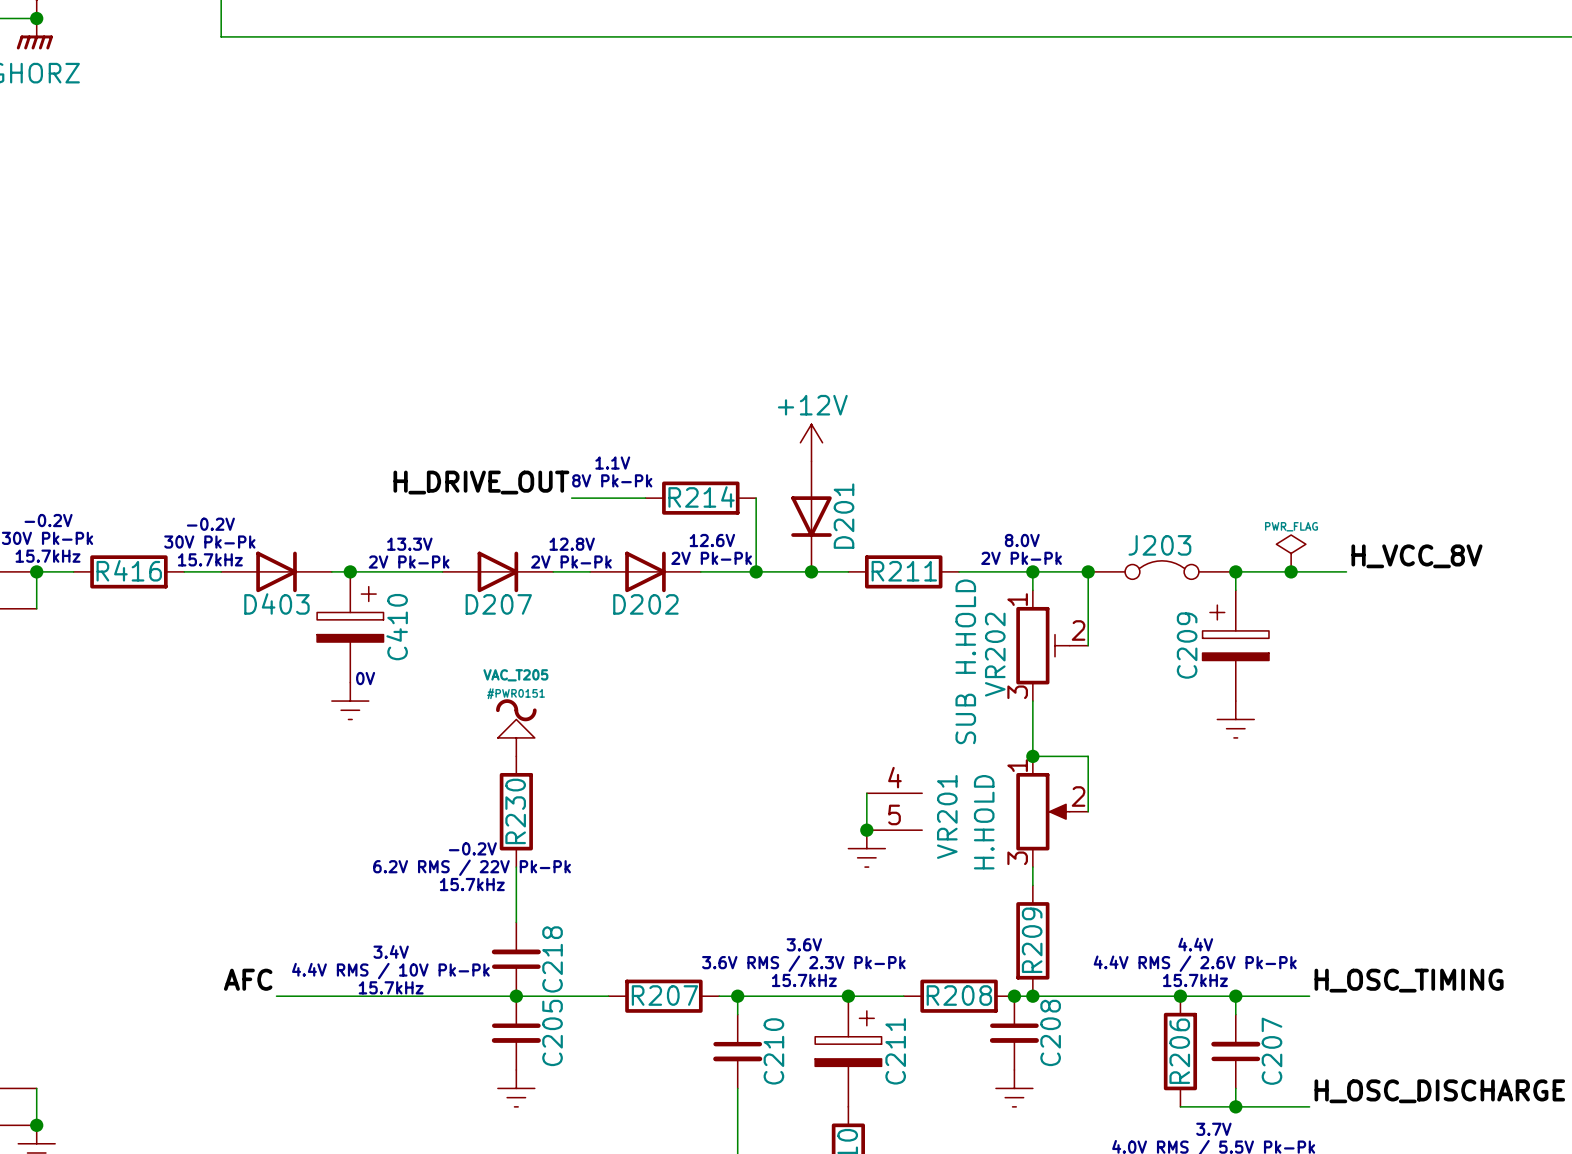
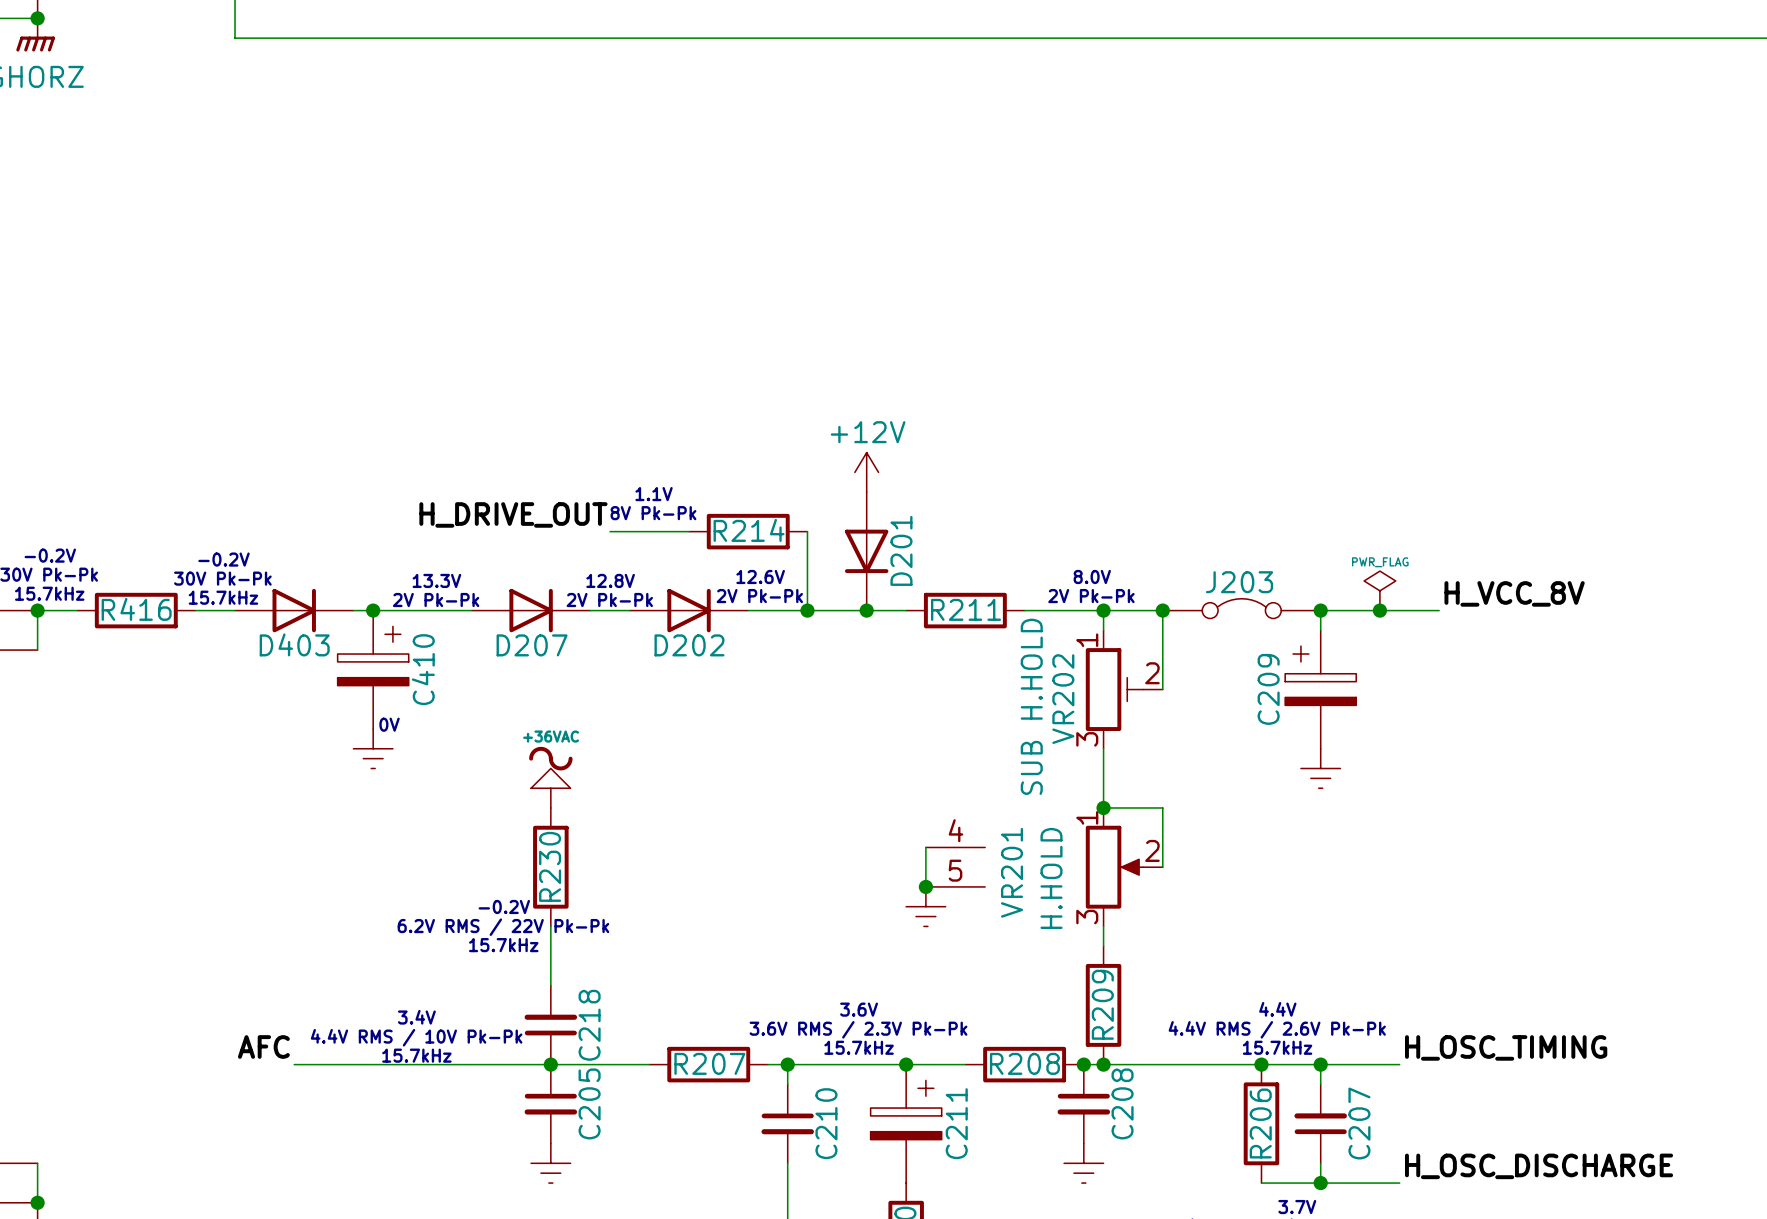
power symbol: VAC_T205 (516, 727) -> +36VAC (550, 777)

